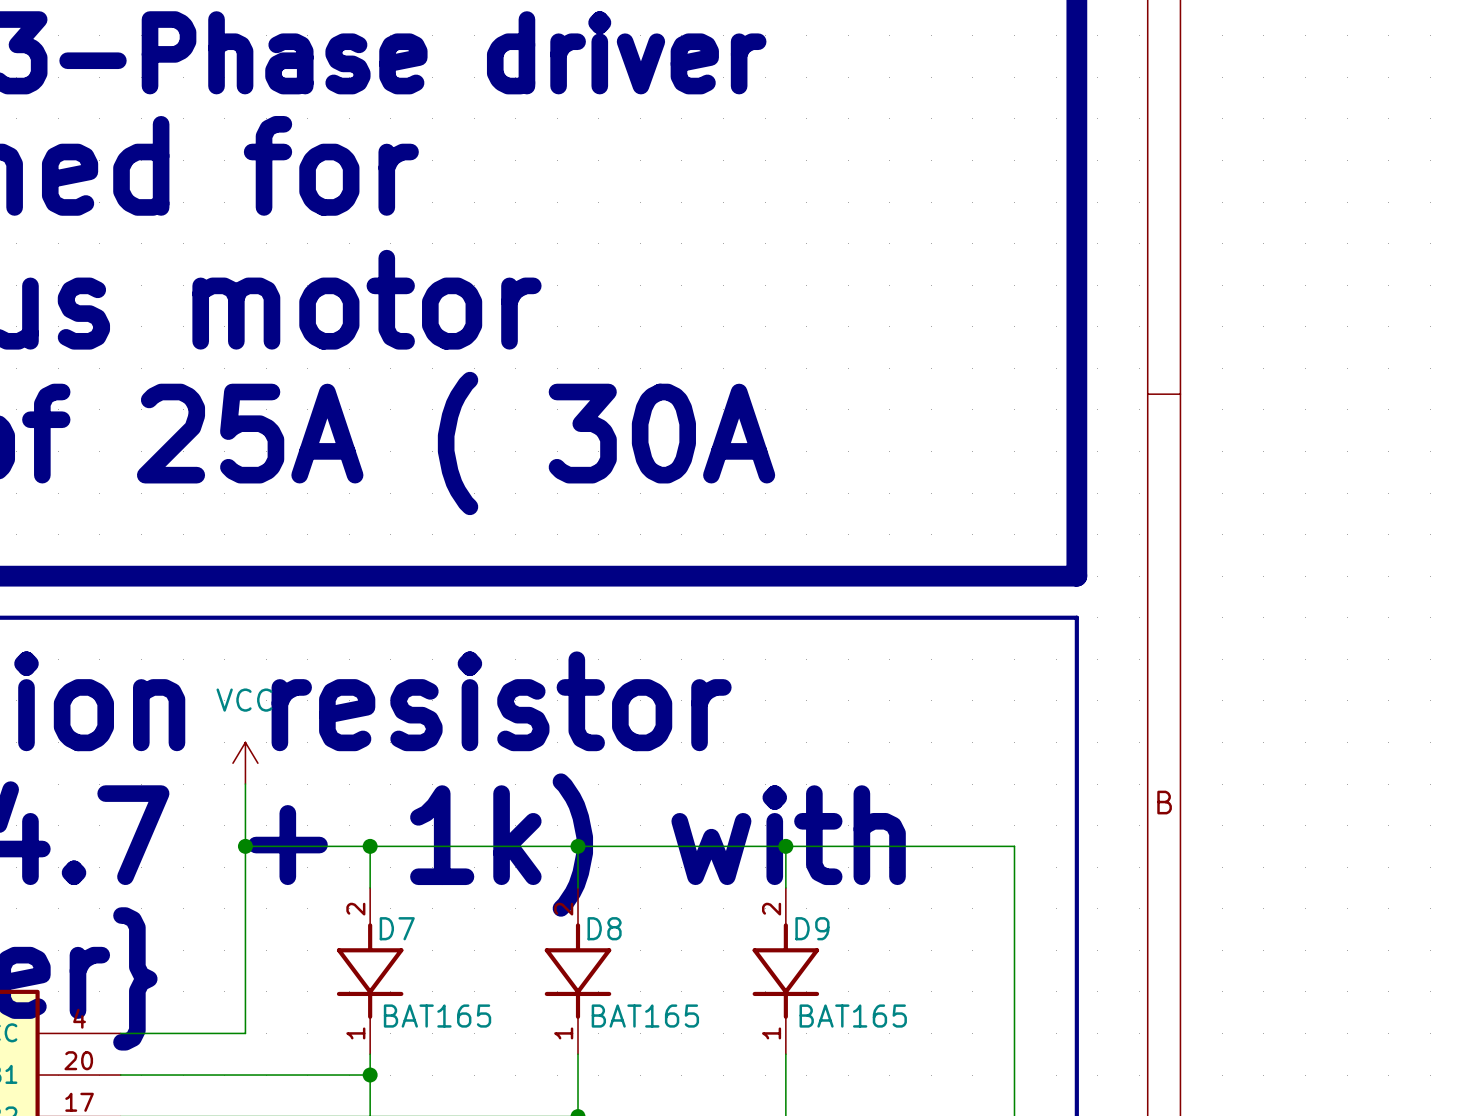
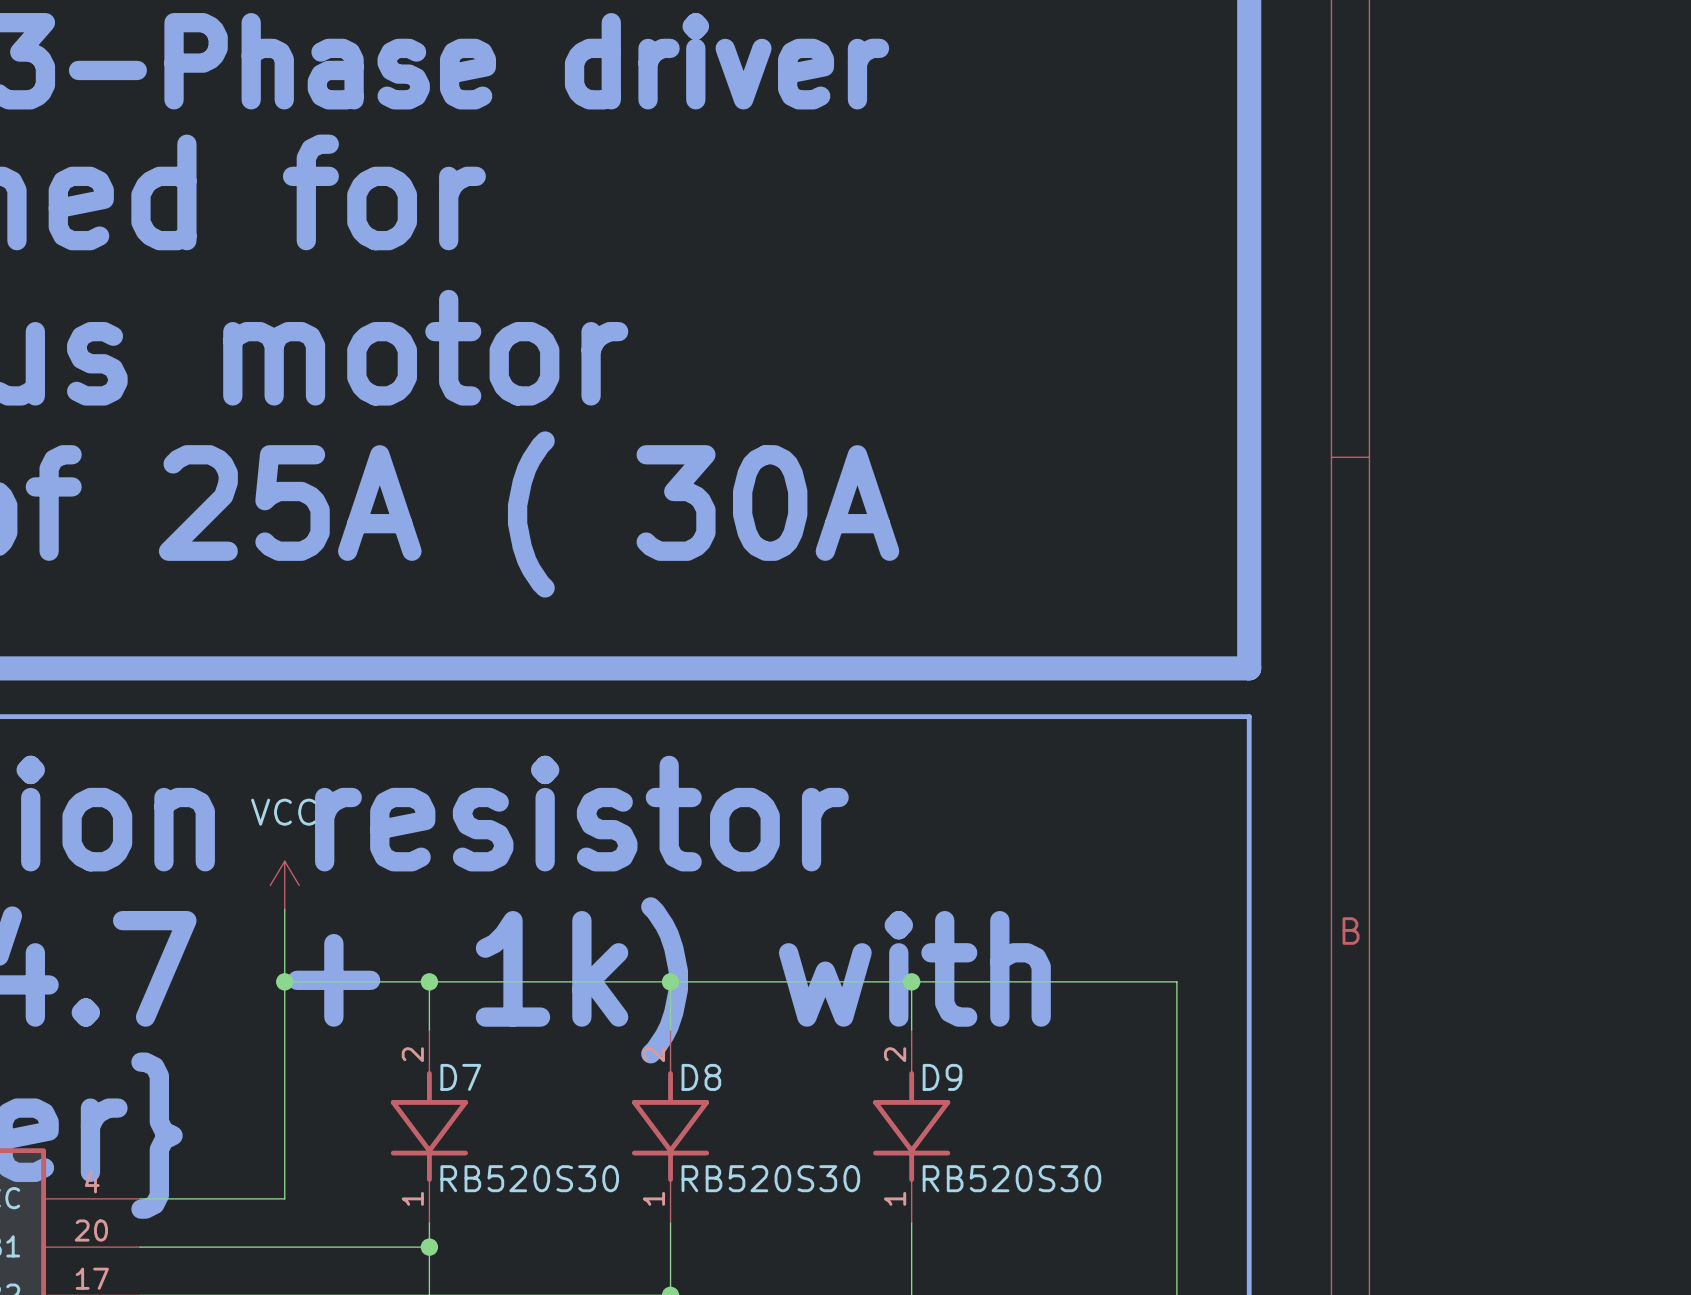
D7 value: BAT165 (437, 1016) -> RB520S30 (529, 1178)
D8 value: BAT165 (645, 1016) -> RB520S30 (770, 1178)
D9 value: BAT165 (853, 1016) -> RB520S30 (1011, 1178)

